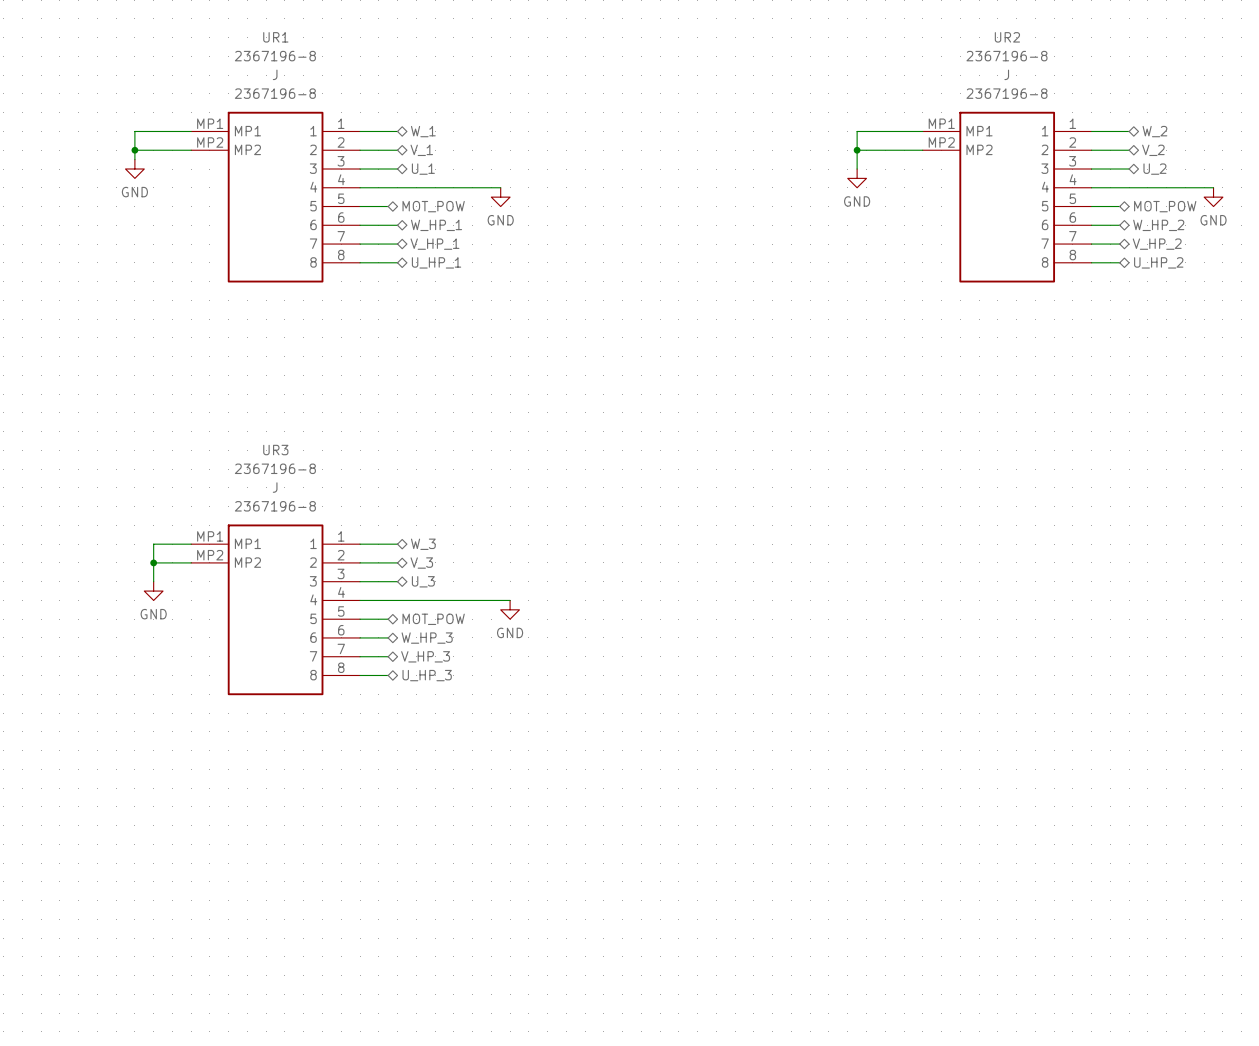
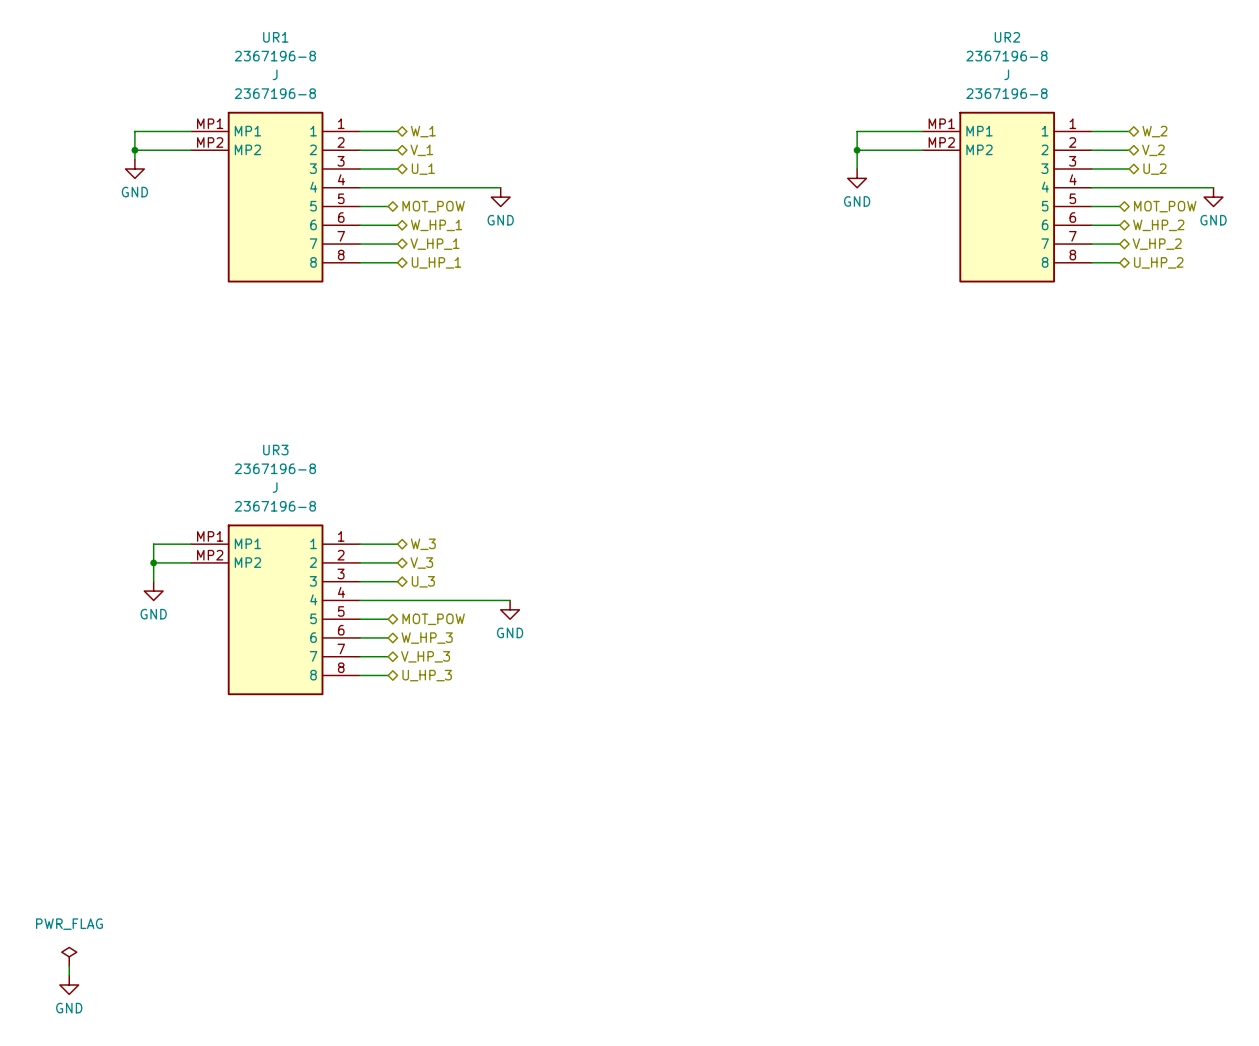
power symbol: none -> PWR_FLAG (69, 956)
wire: none -> (69, 966) (69, 975)
power symbol: none -> GND (69, 985)

